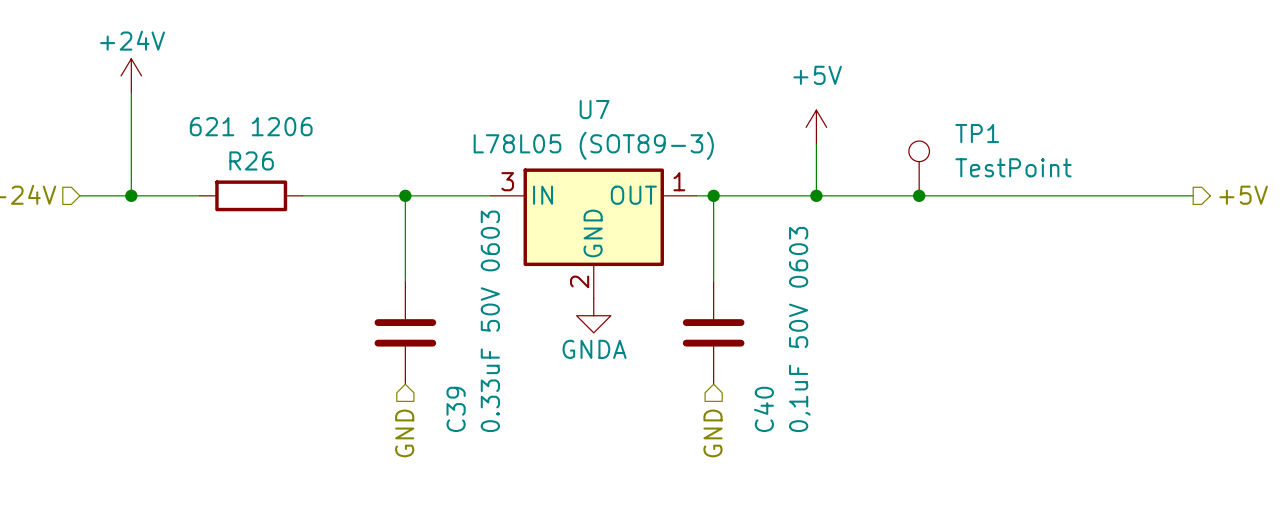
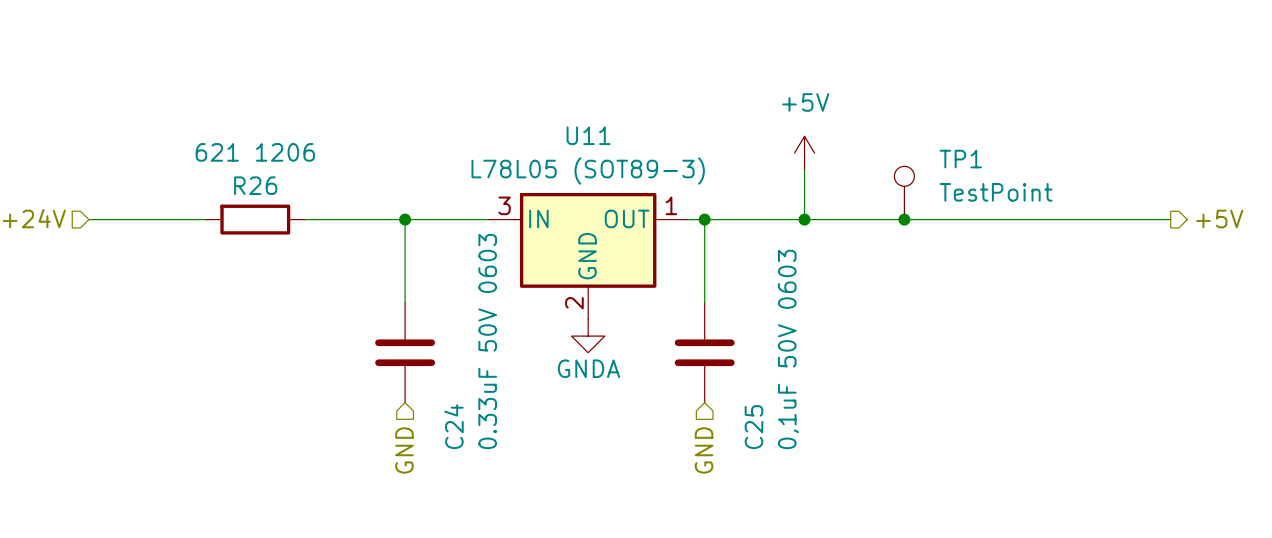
power symbol: +24V (131, 75) -> none
wire: (131, 93) (131, 195) -> none
U7 name: U7 (594, 109) -> U11 (588, 135)
junction: (131, 195) -> none
C39 name: C39 (456, 409) -> C24 (454, 426)
C40 name: C40 (763, 409) -> C25 (753, 427)

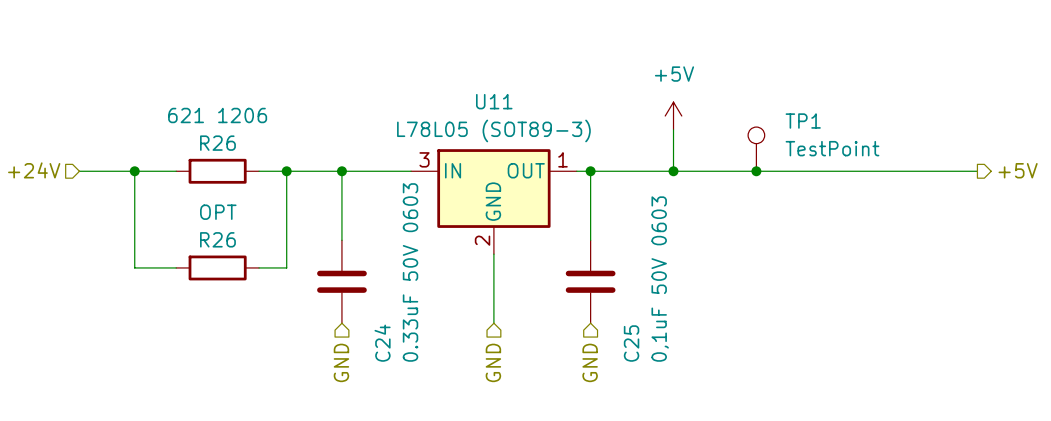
wire: none -> (134, 171) (134, 267) (176, 267)
junction: none -> (134, 171)
wire: none -> (286, 171) (286, 267) (259, 267)
junction: none -> (286, 171)
wire: none -> (493, 254) (493, 323)
R26: none -> OPT (217, 267)
power symbol: GNDA (588, 336) -> none
hierarchical label: none -> GND (493, 362)

